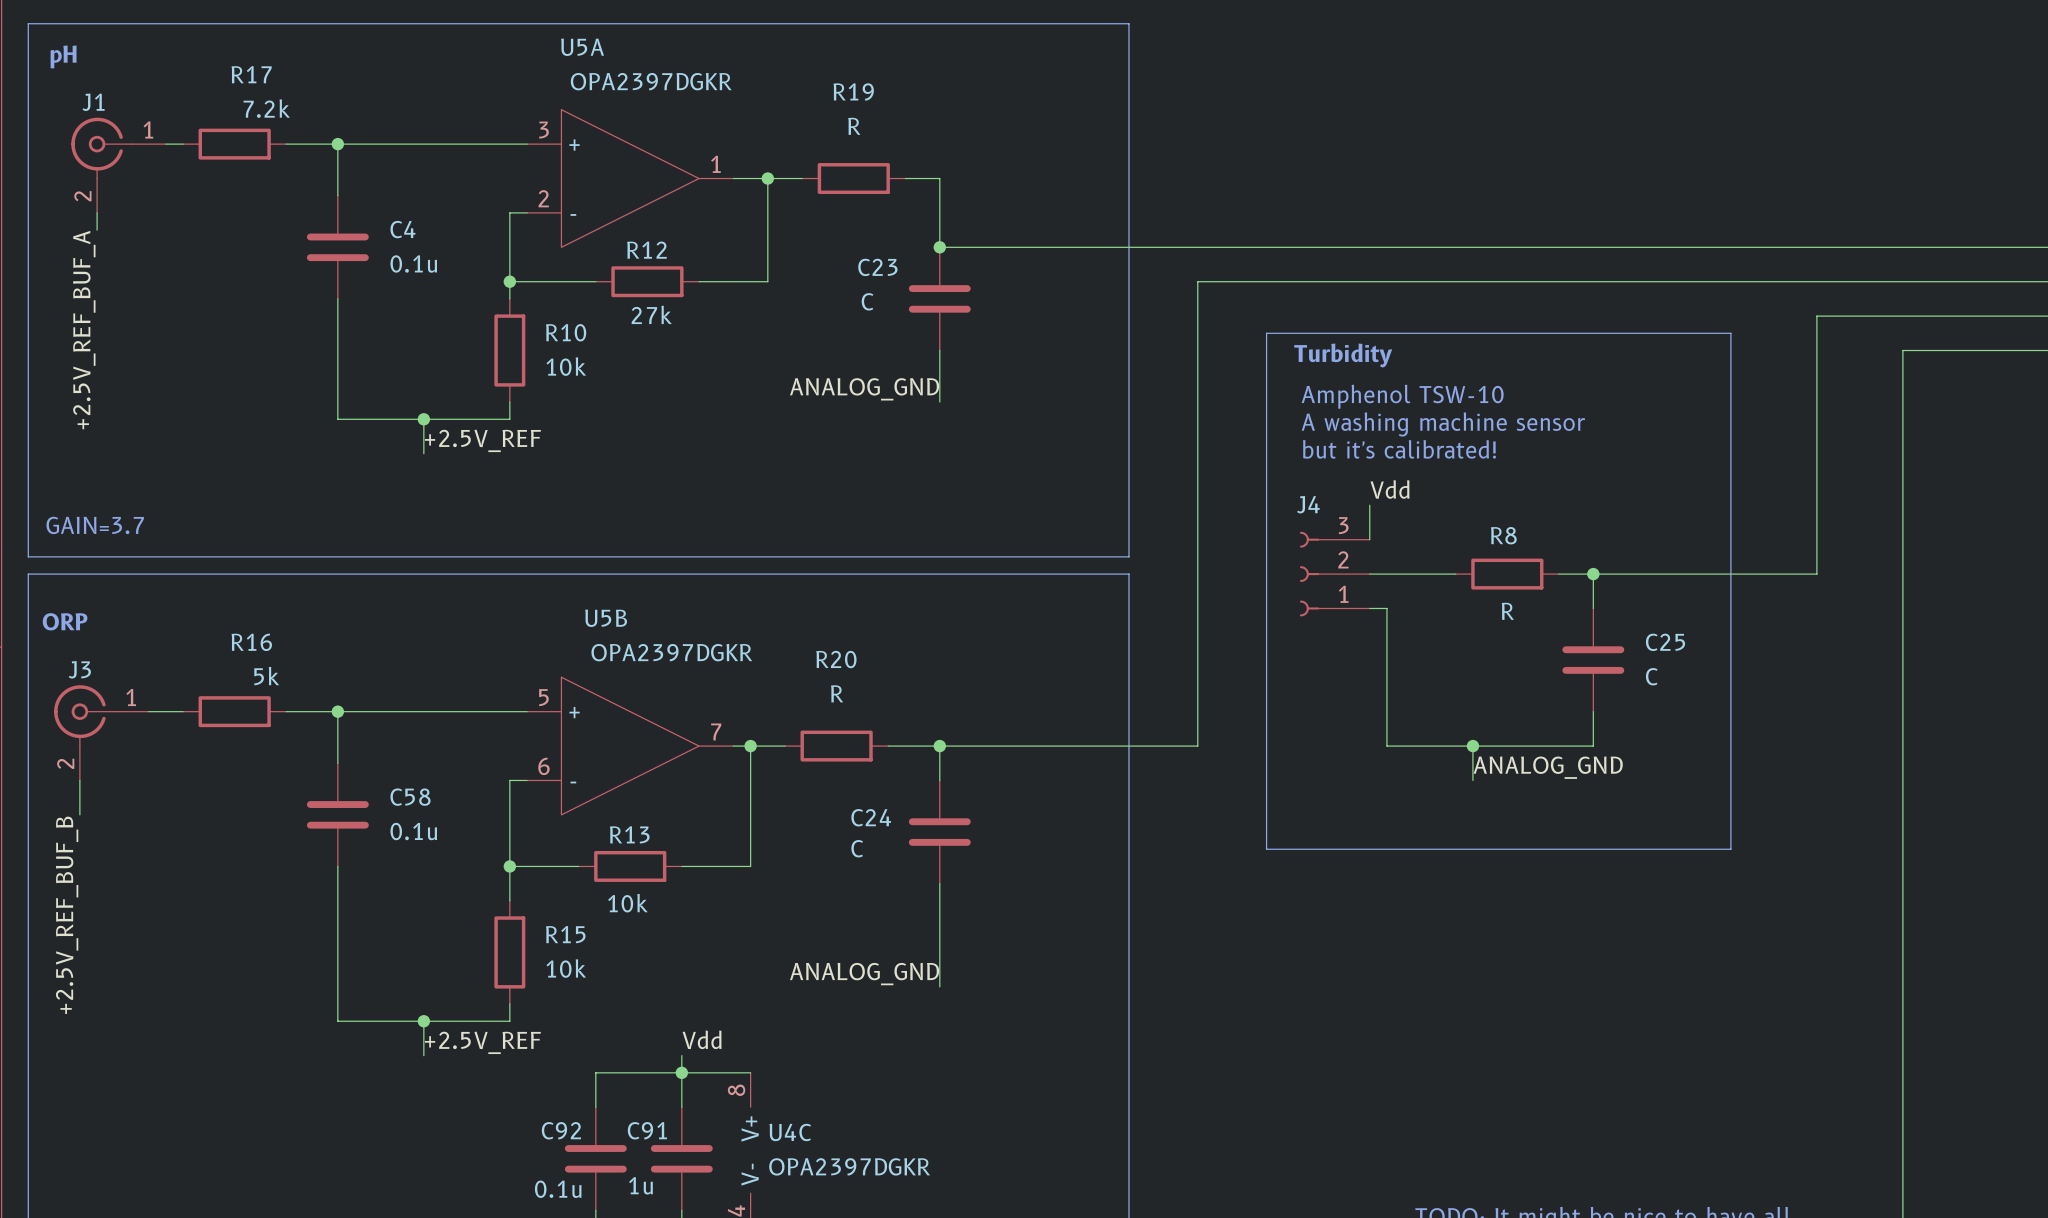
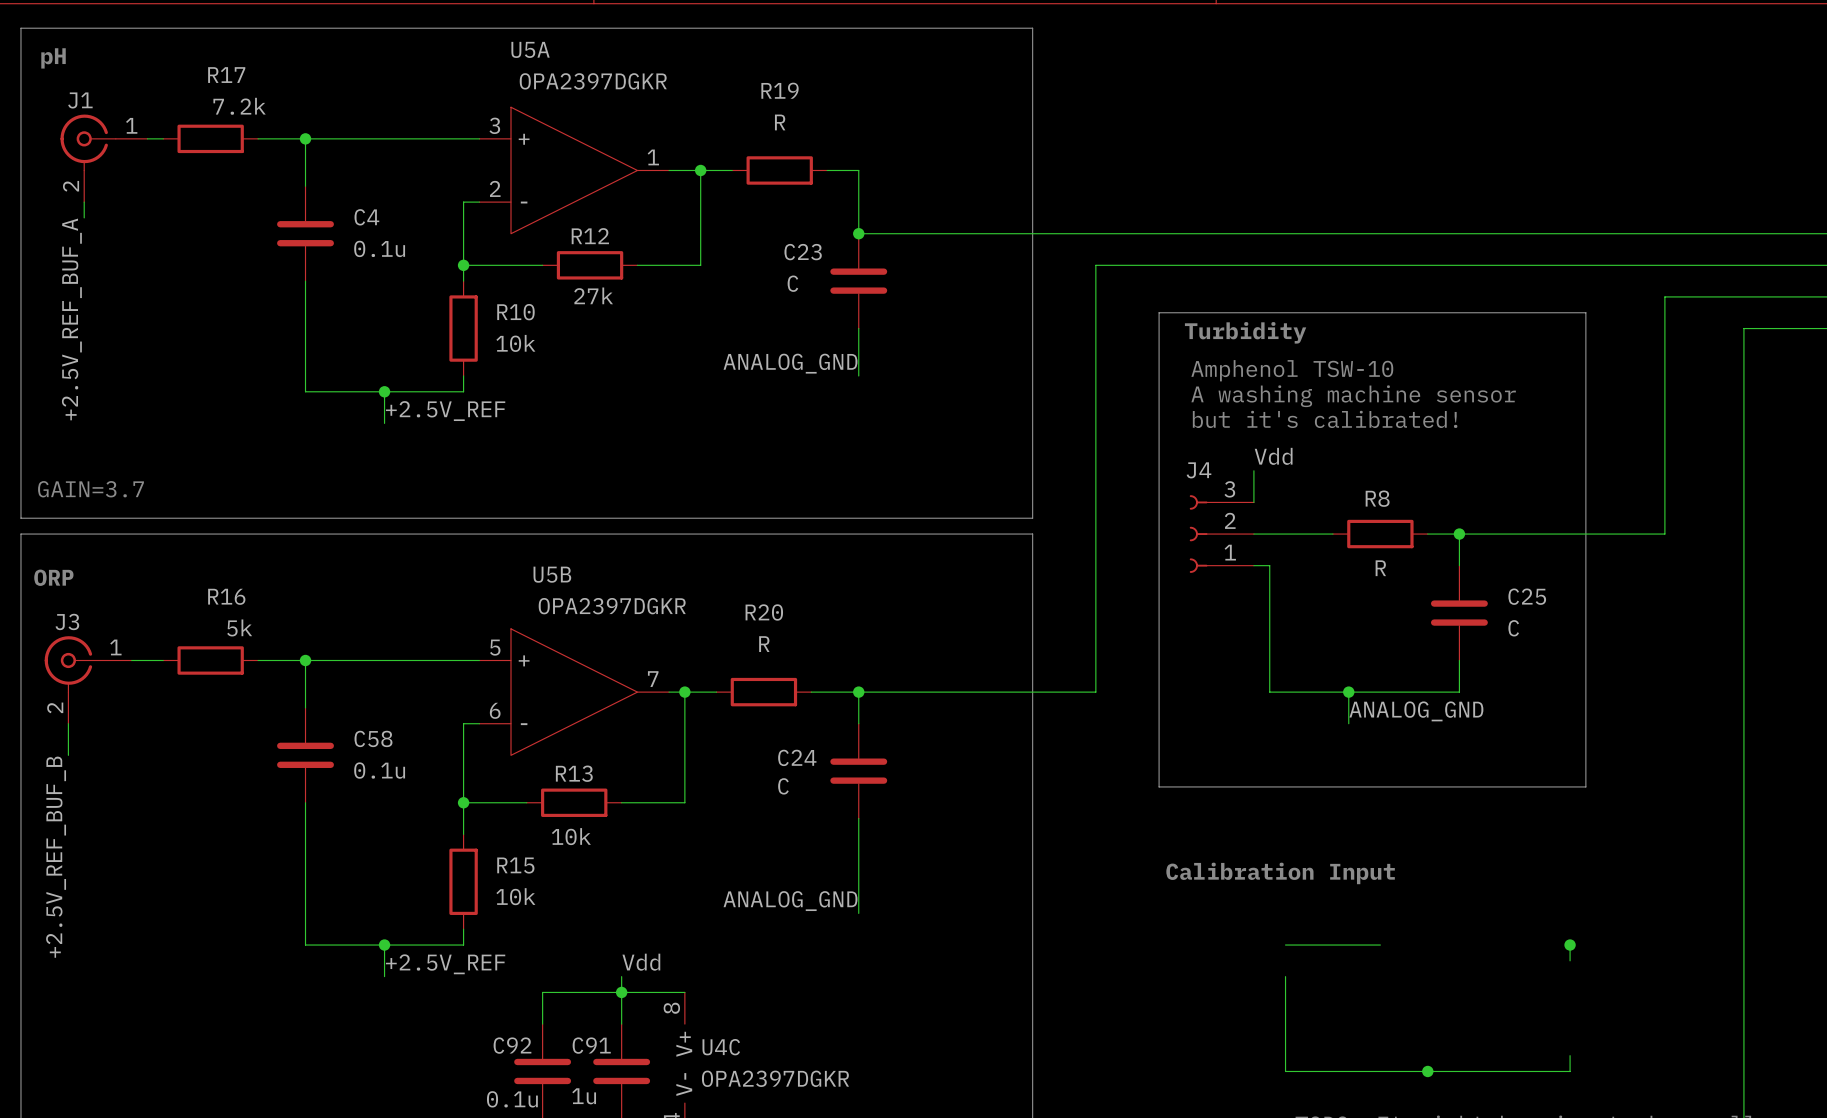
text: none -> Calibration Input (1280, 873)
wire: none -> (1285, 945) (1380, 945)
wire: none -> (1570, 945) (1570, 960)
junction: none -> (1570, 945)
wire: none -> (1285, 976) (1285, 1071) (1570, 1071) (1570, 1055)
junction: none -> (1427, 1071)

